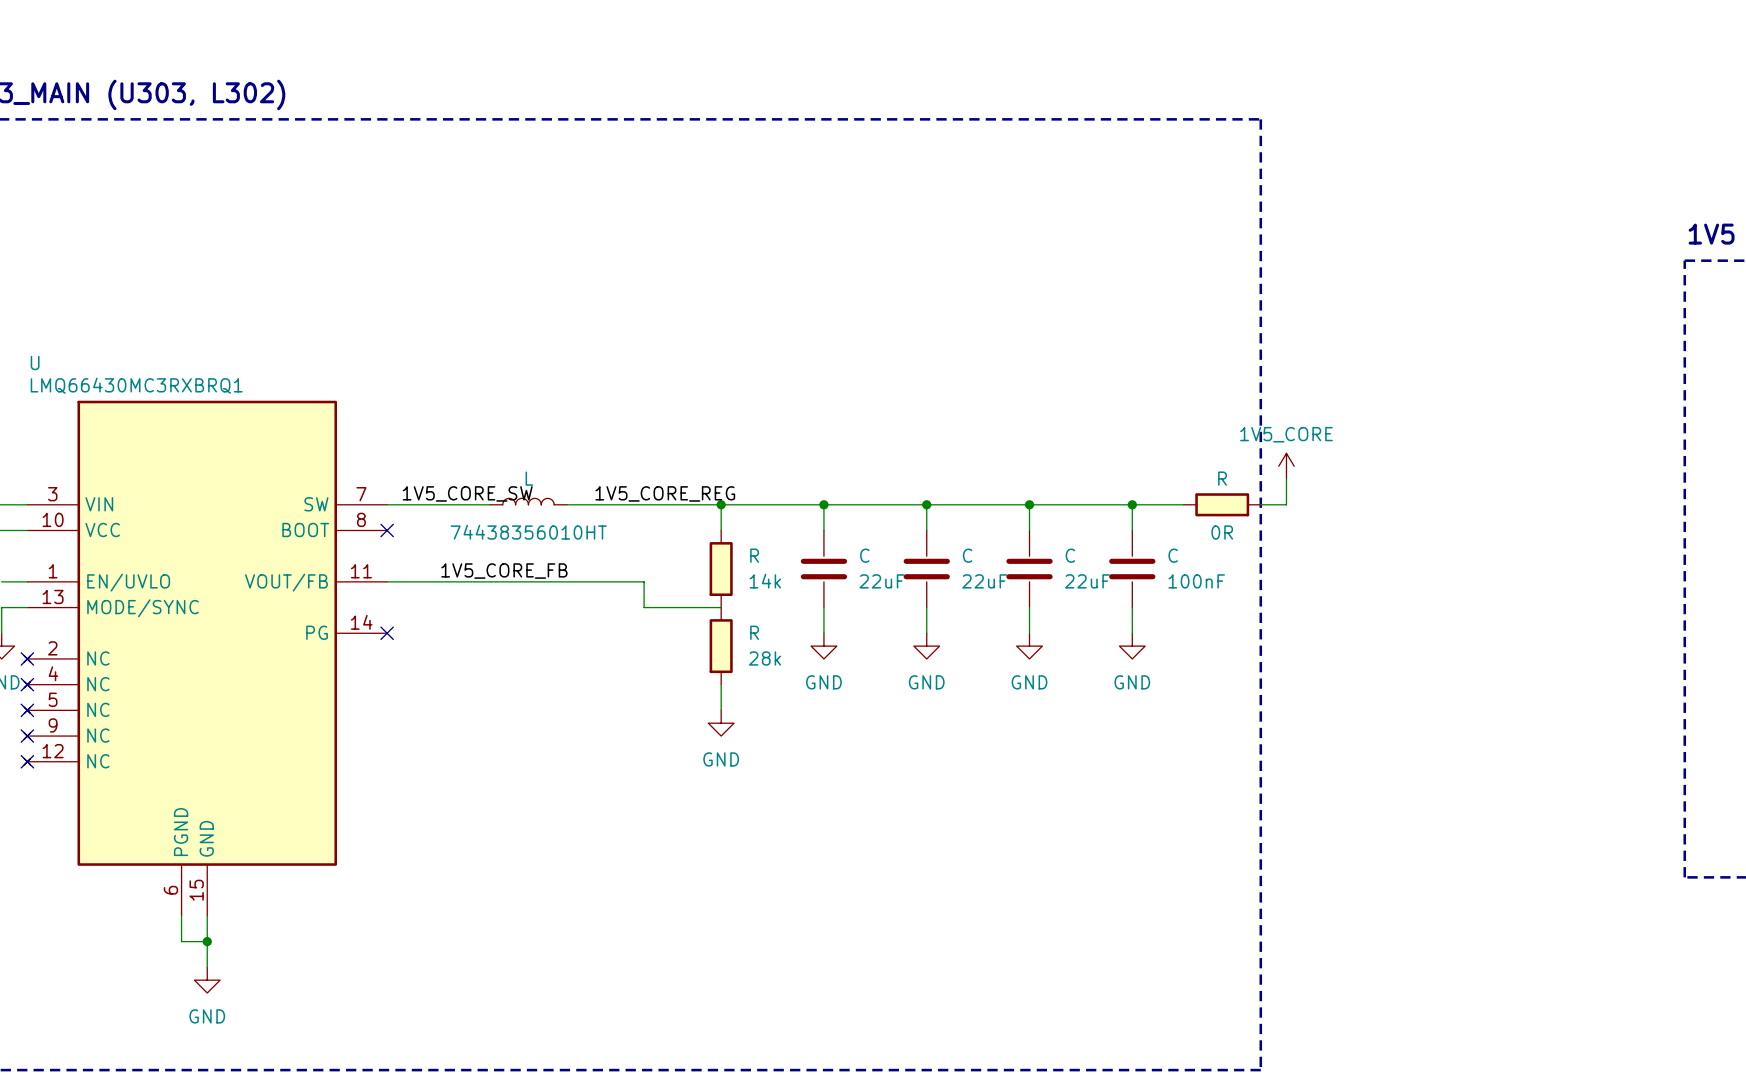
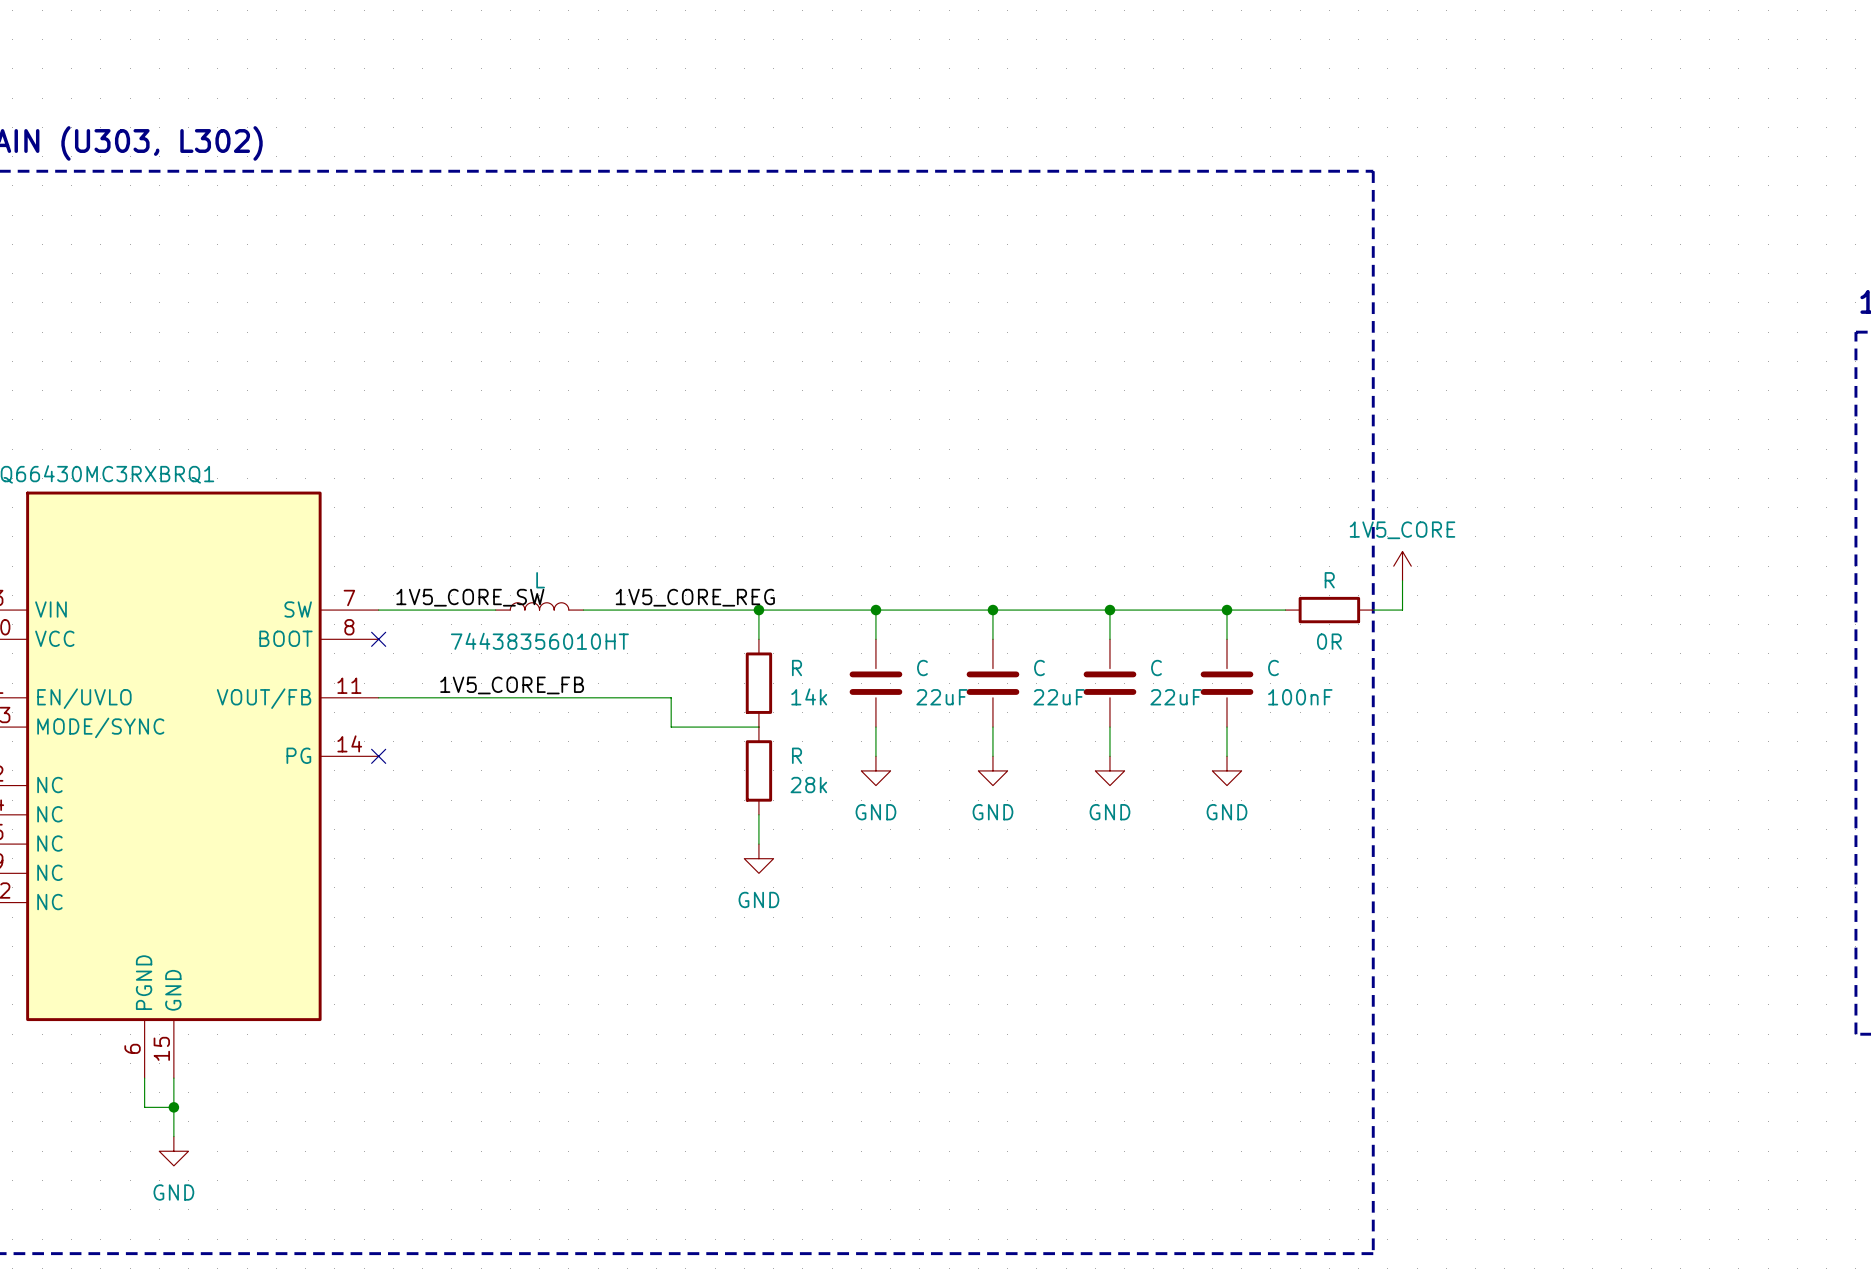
R symbol: [1183, 493, 1261, 517] -> [1285, 596, 1374, 624]
R symbol: [709, 530, 733, 608] -> [745, 639, 773, 728]
R symbol: [709, 607, 733, 685] -> [745, 727, 773, 815]

